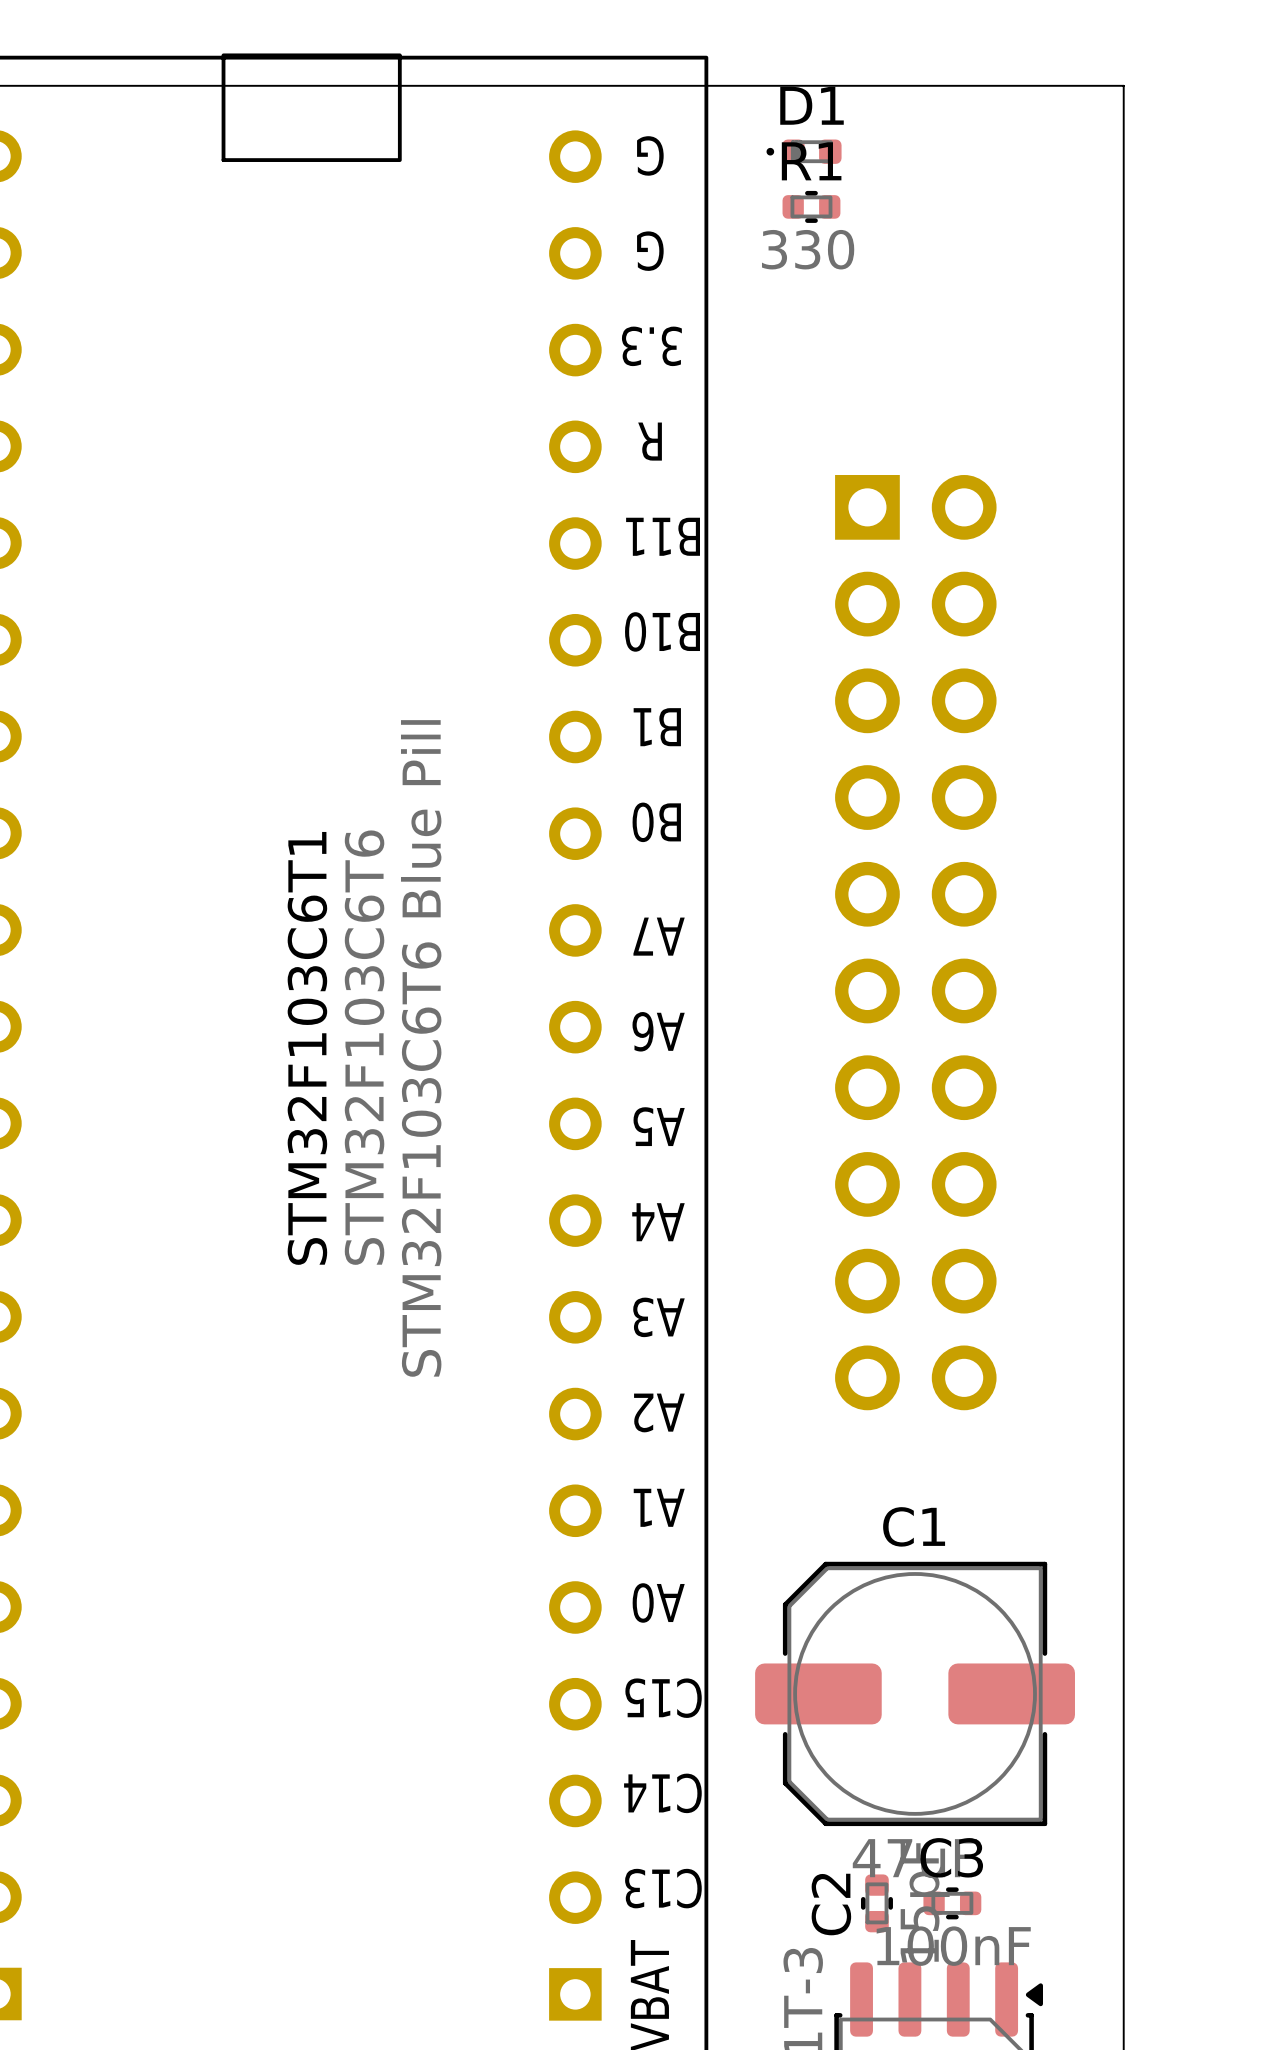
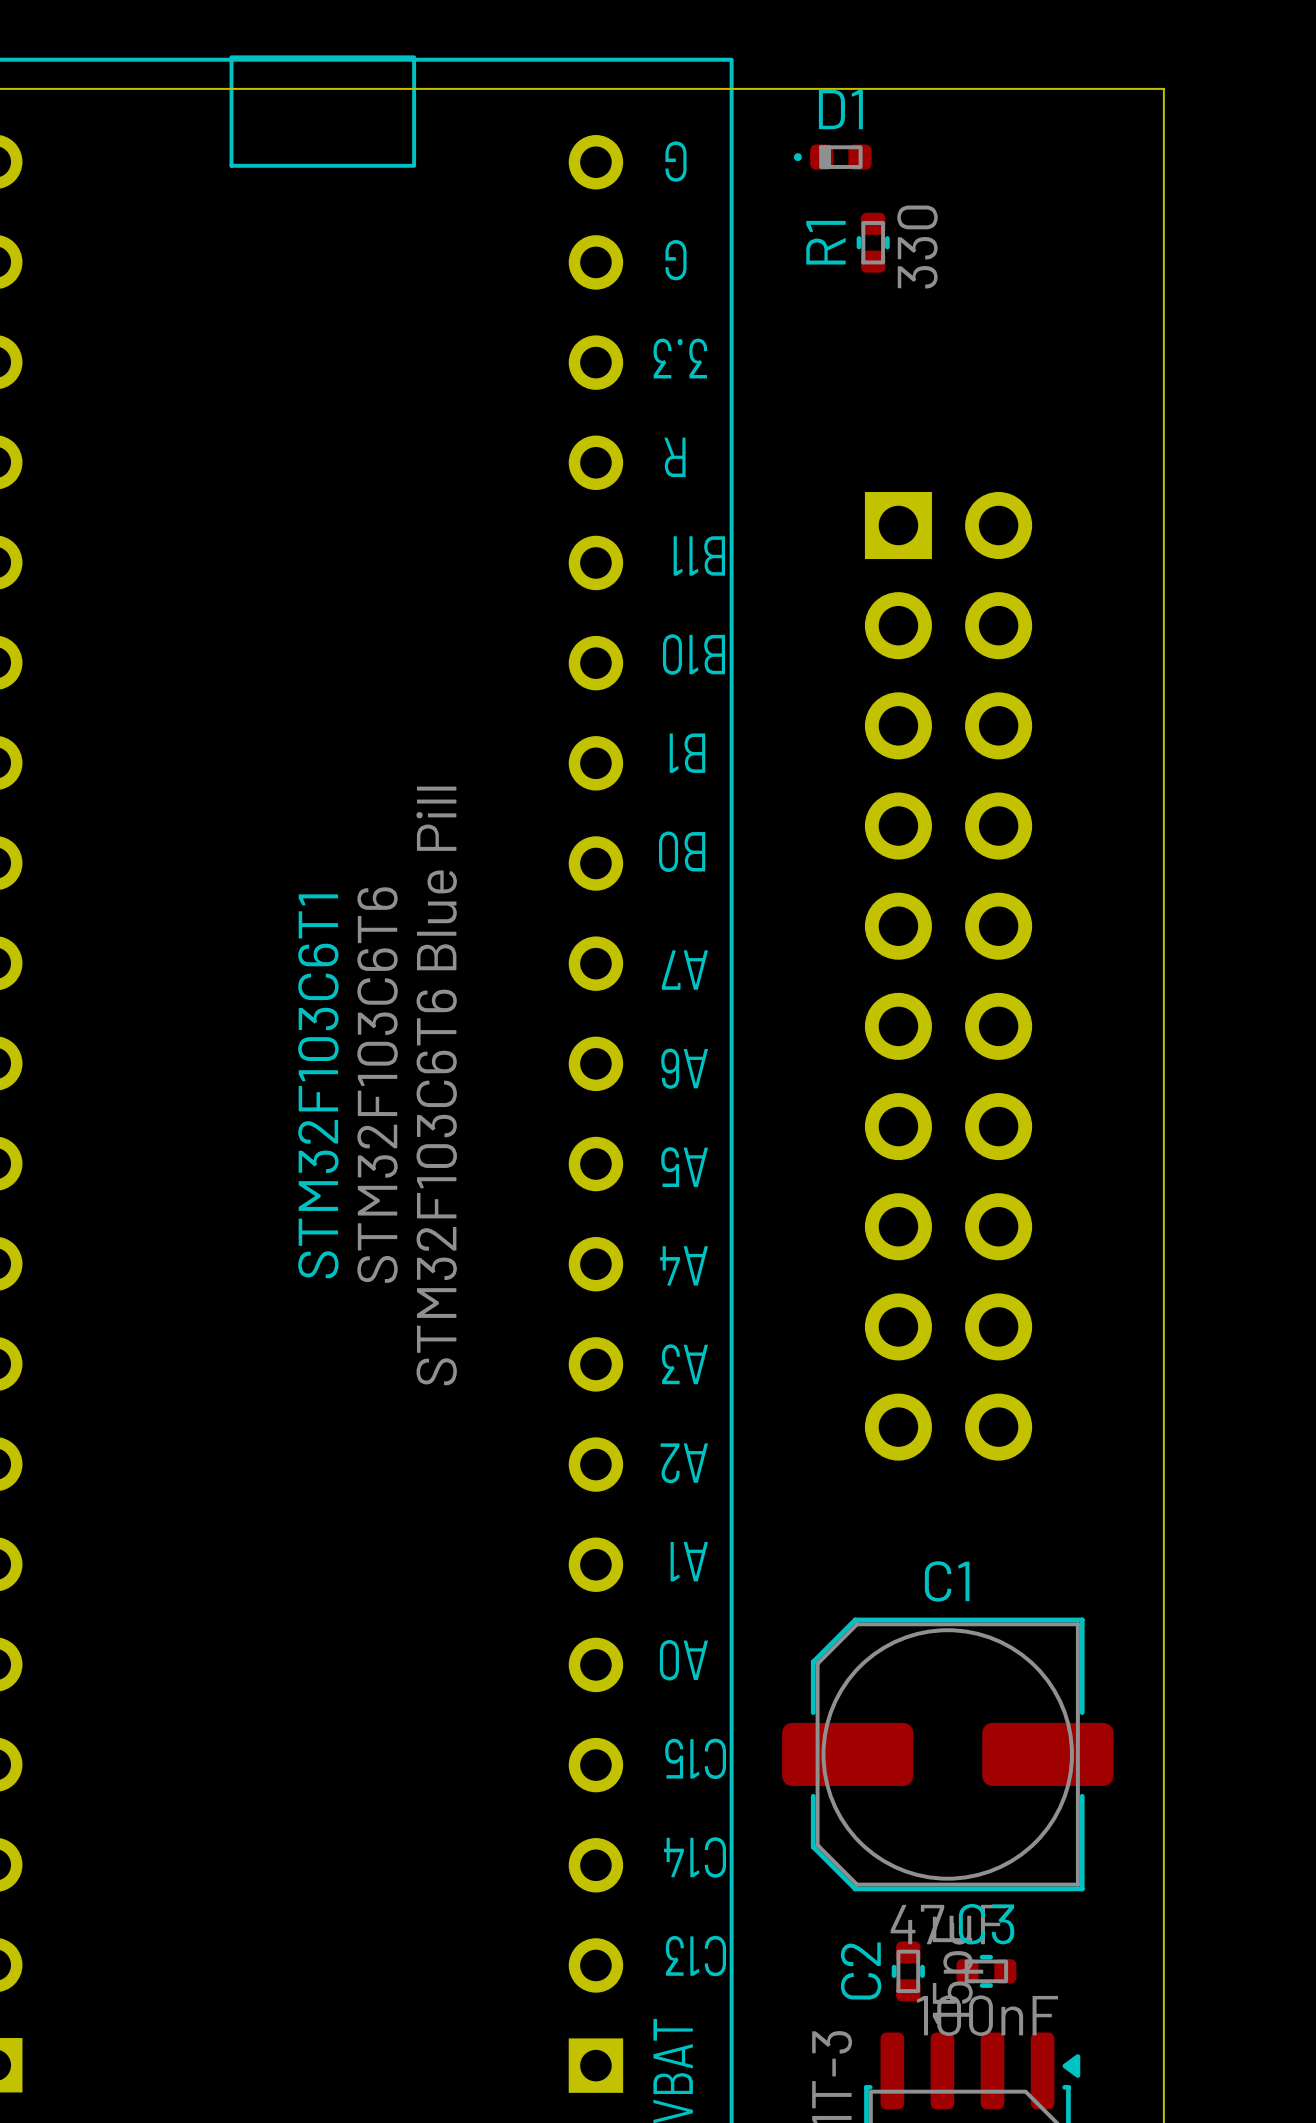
R1 rotation: 0° (811, 206) -> 90° clockwise (873, 242)
R1 position: (811, 206) -> (873, 242)

